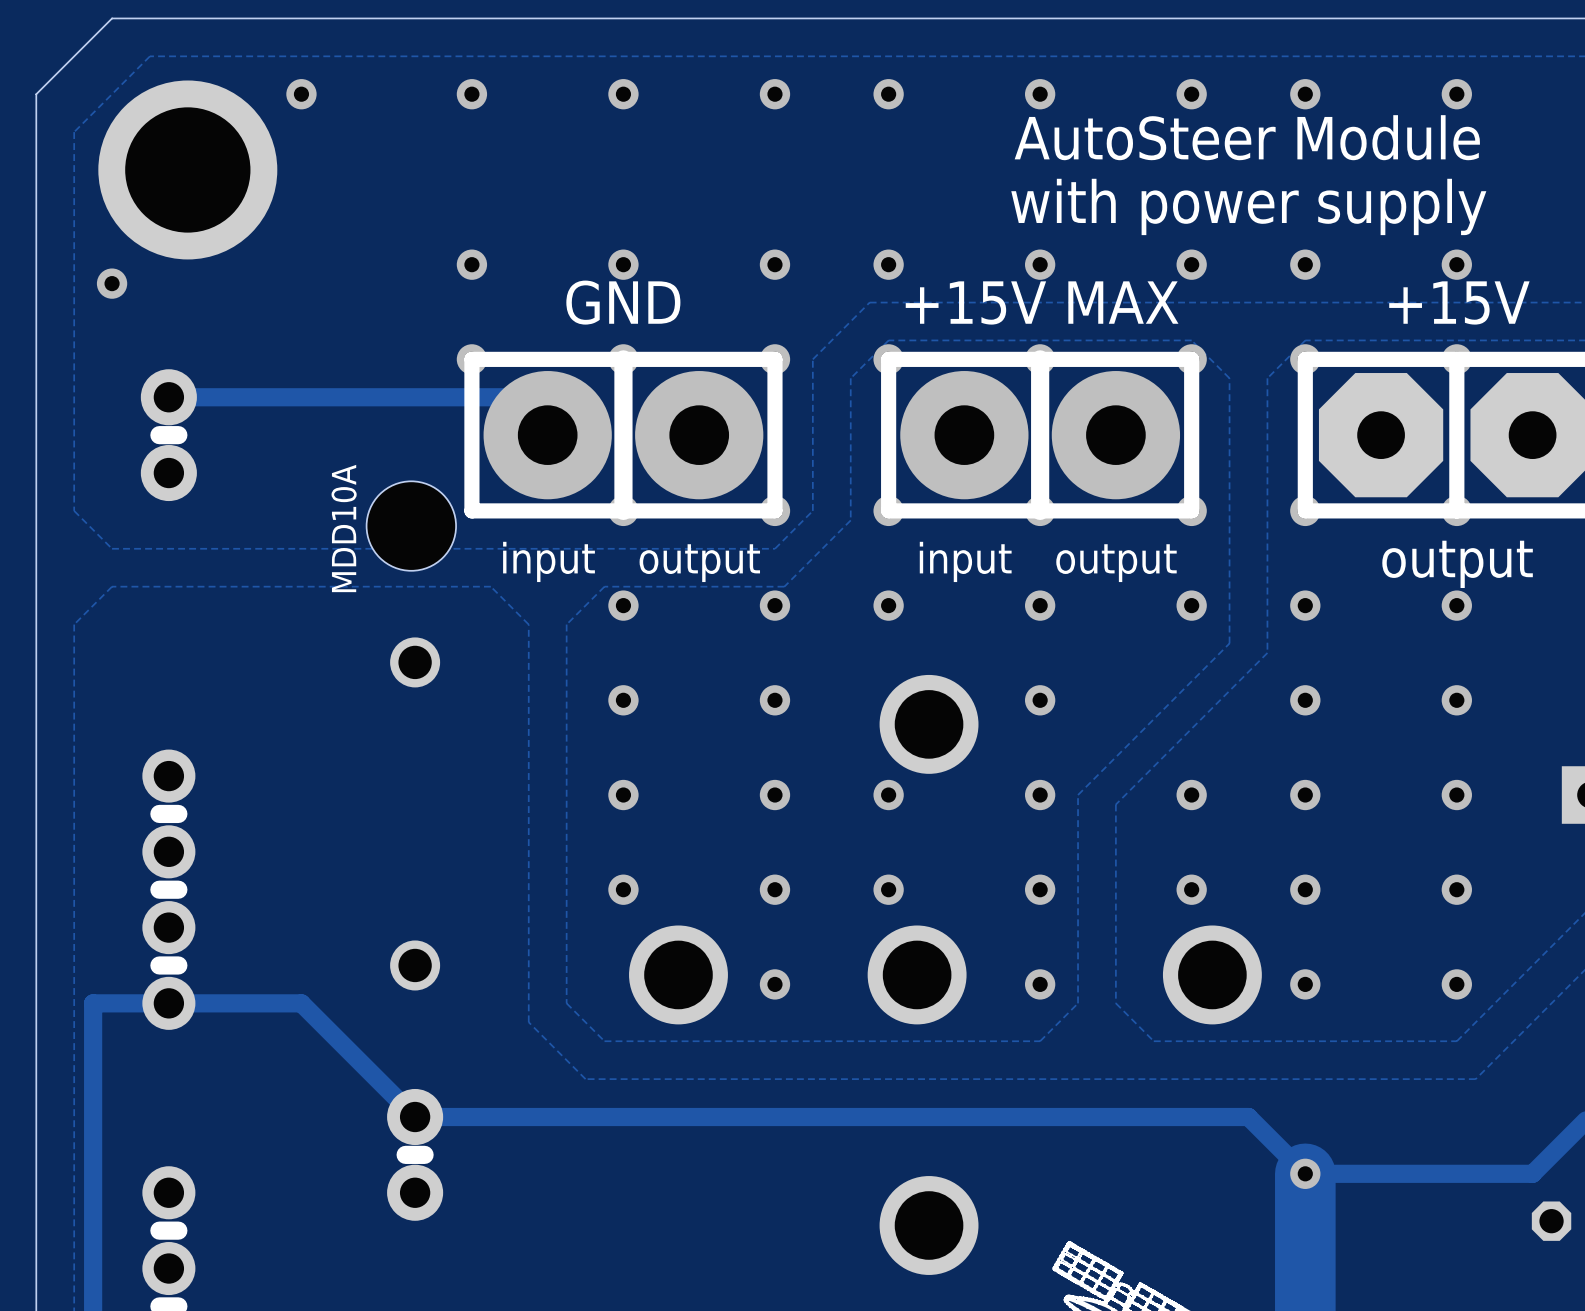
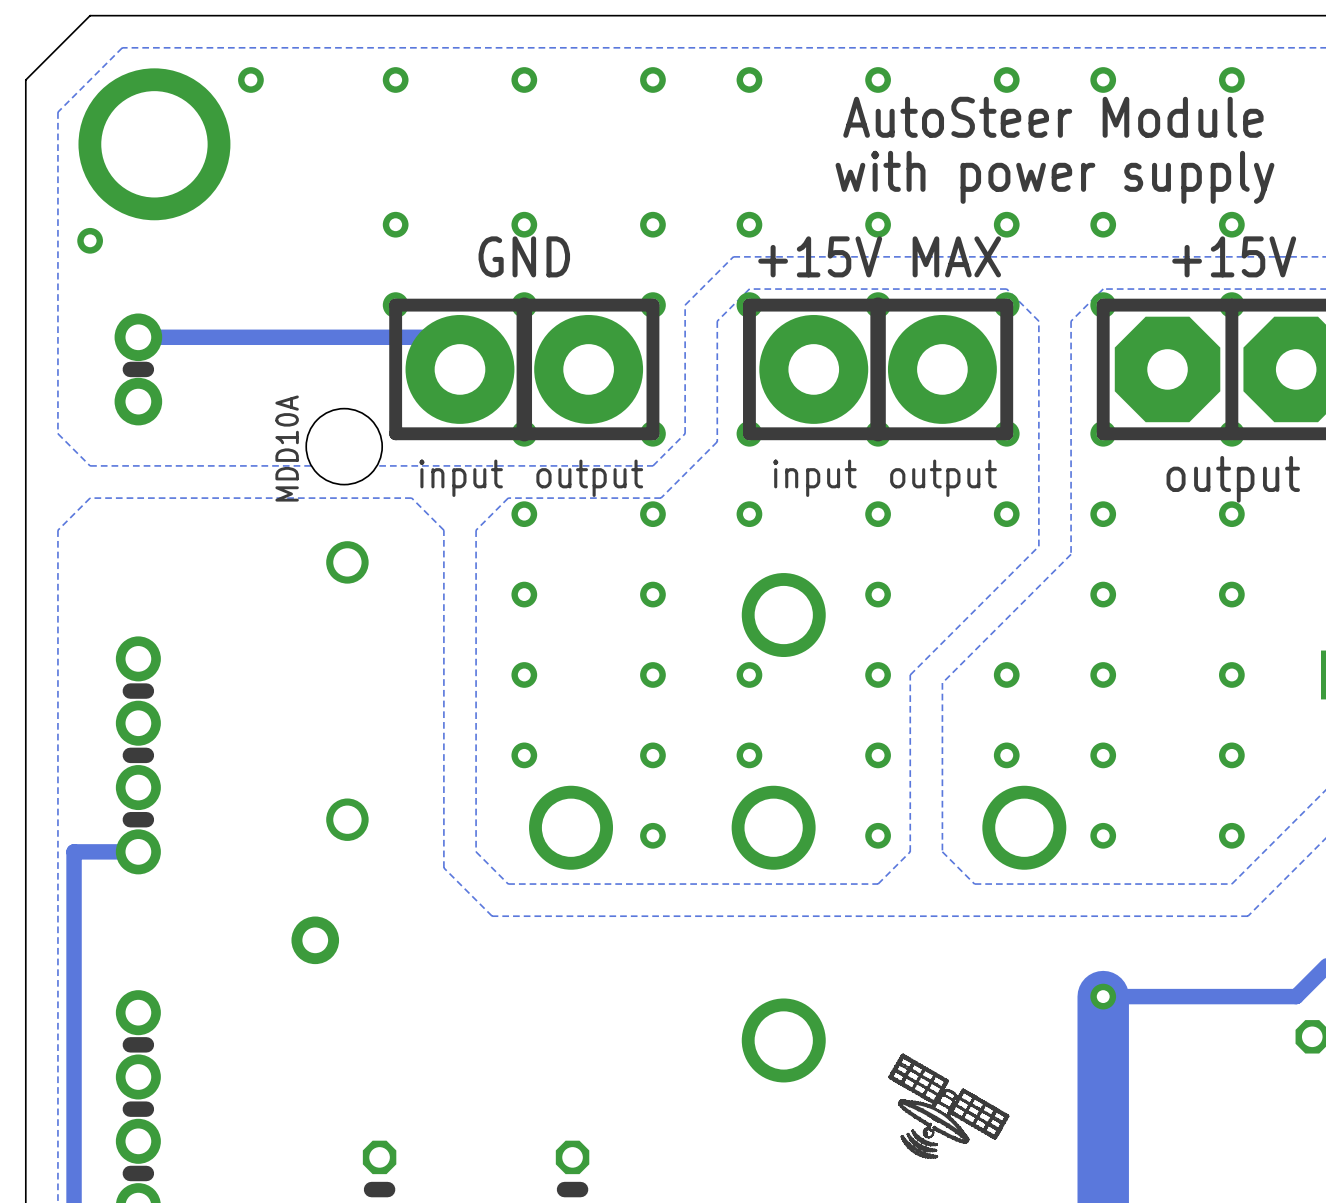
track: (168, 1003) (301, 1003) (415, 1117) (1248, 1117) (1305, 1173) -> none
part: none -> (315, 940)
part: (415, 1154) -> none
line: (424, 1154) (405, 1154) -> none

